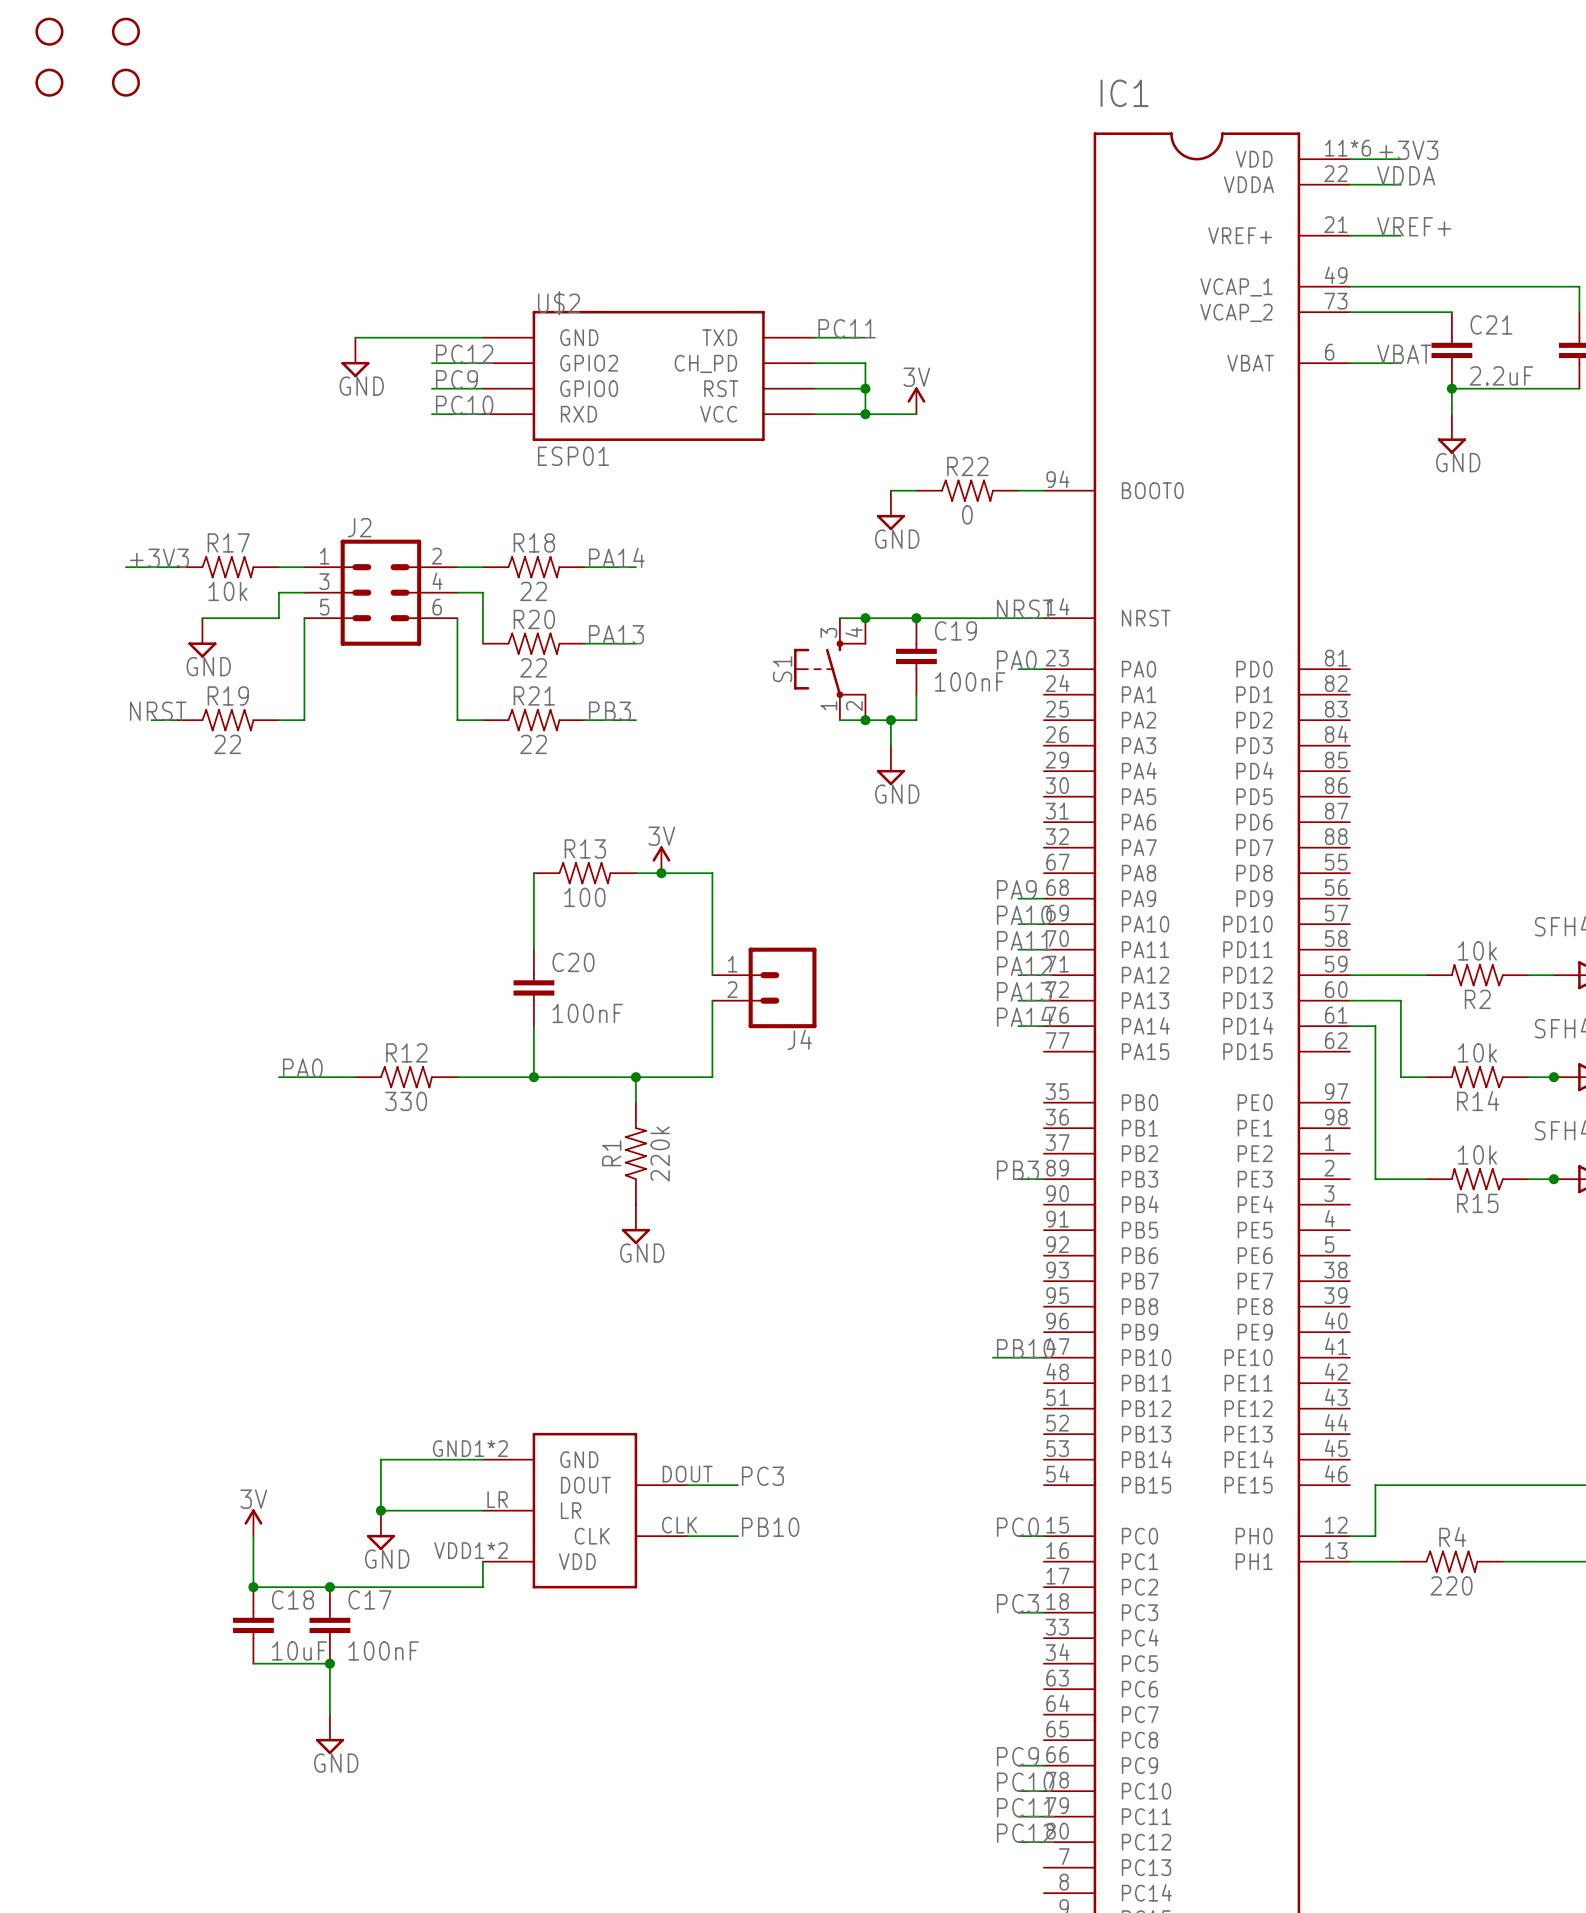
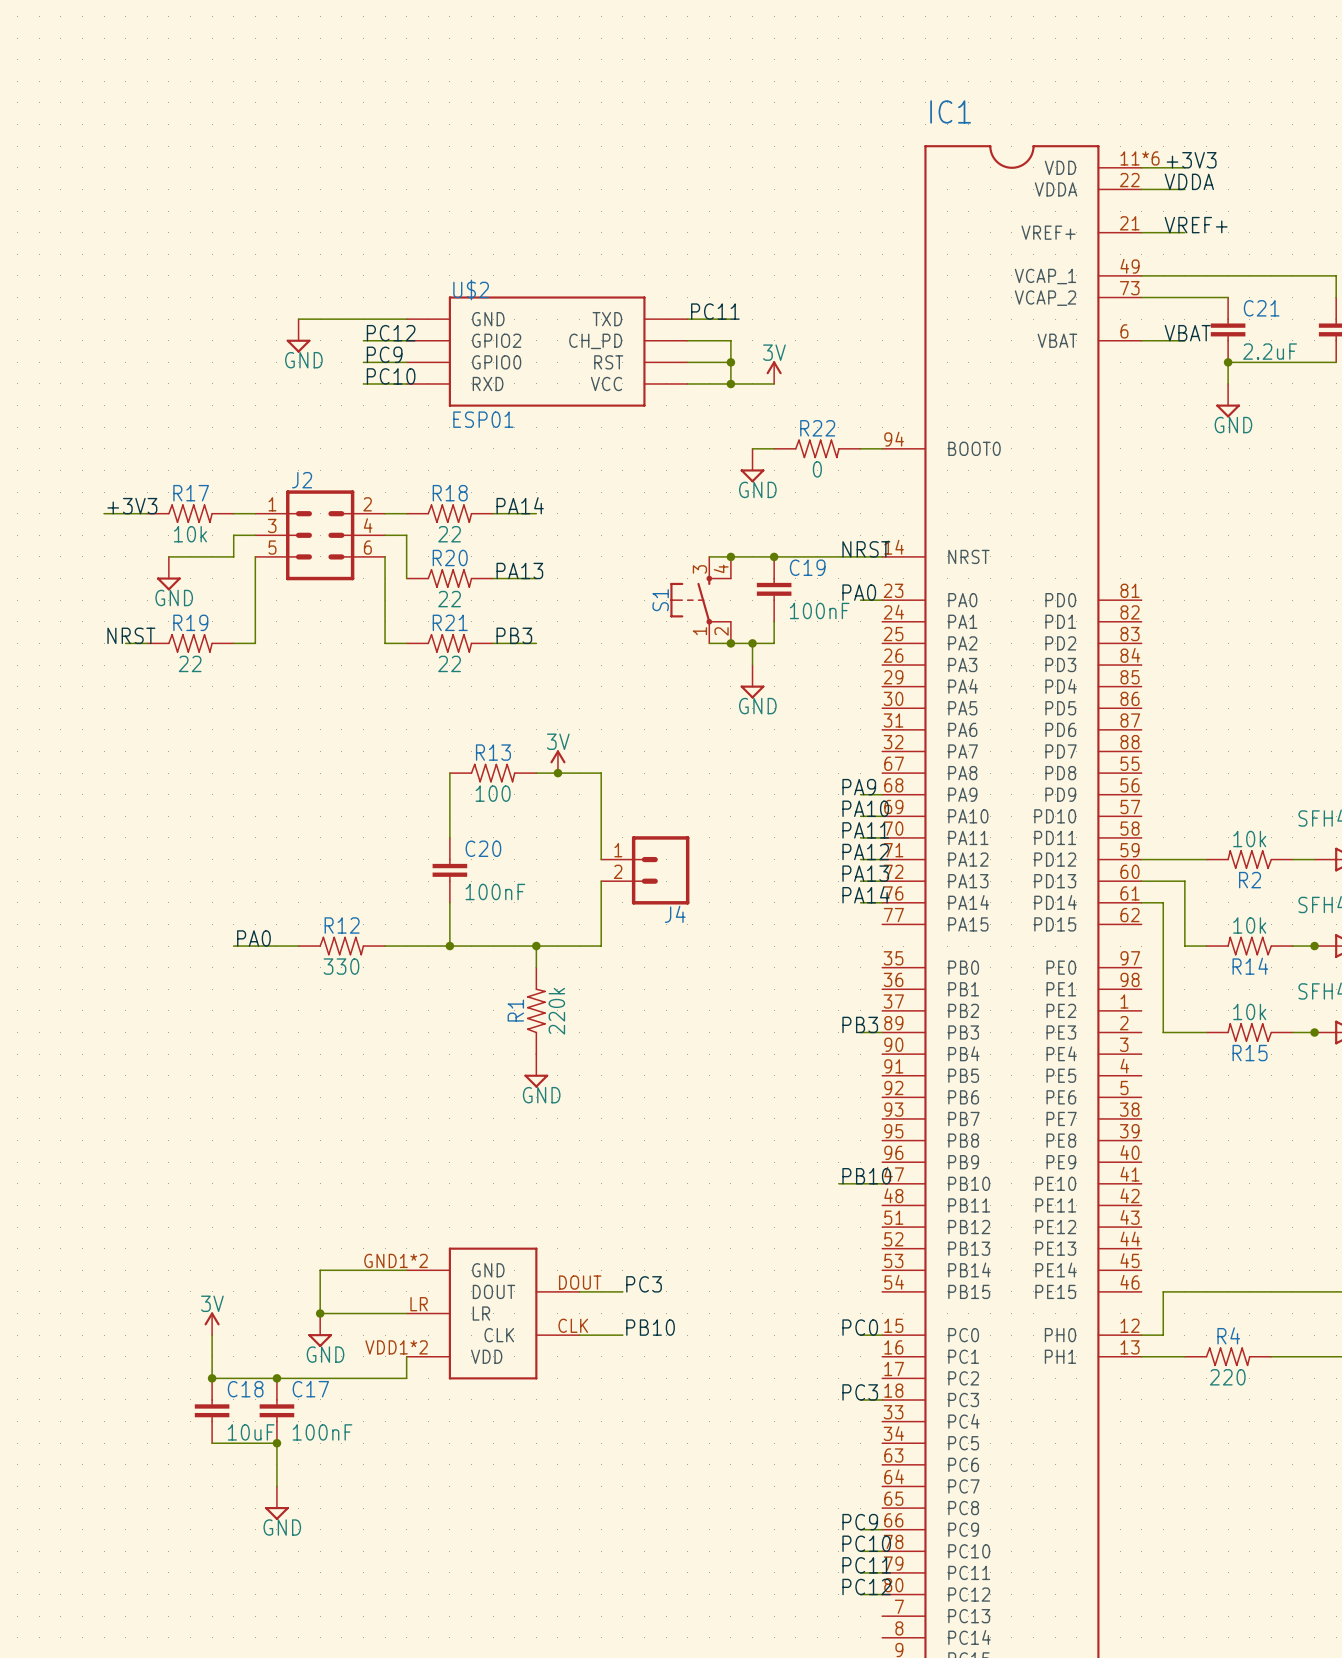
part: (49, 31) -> none
part: (125, 31) -> none
part: (49, 82) -> none
part: (125, 82) -> none

